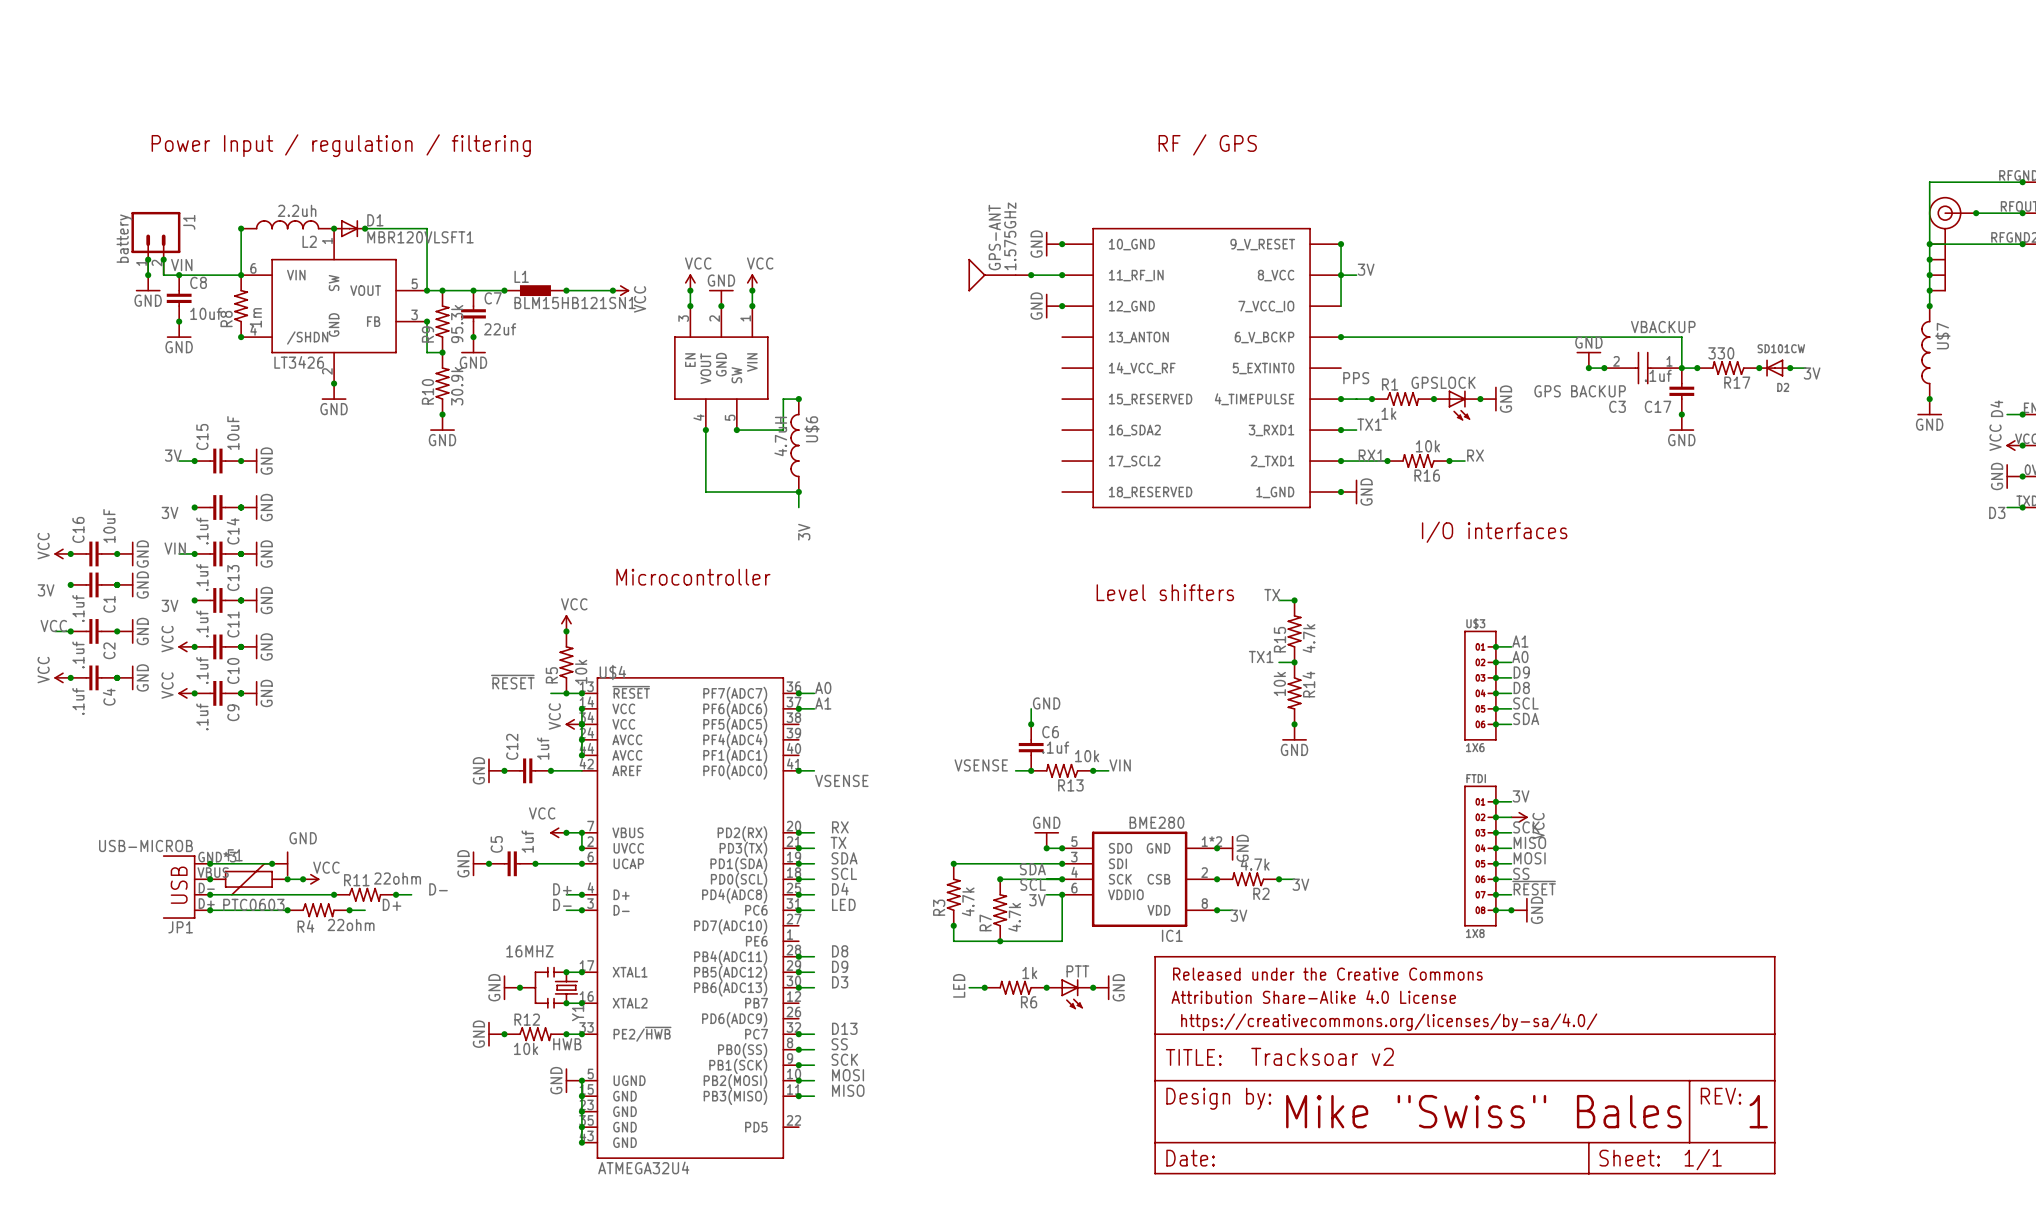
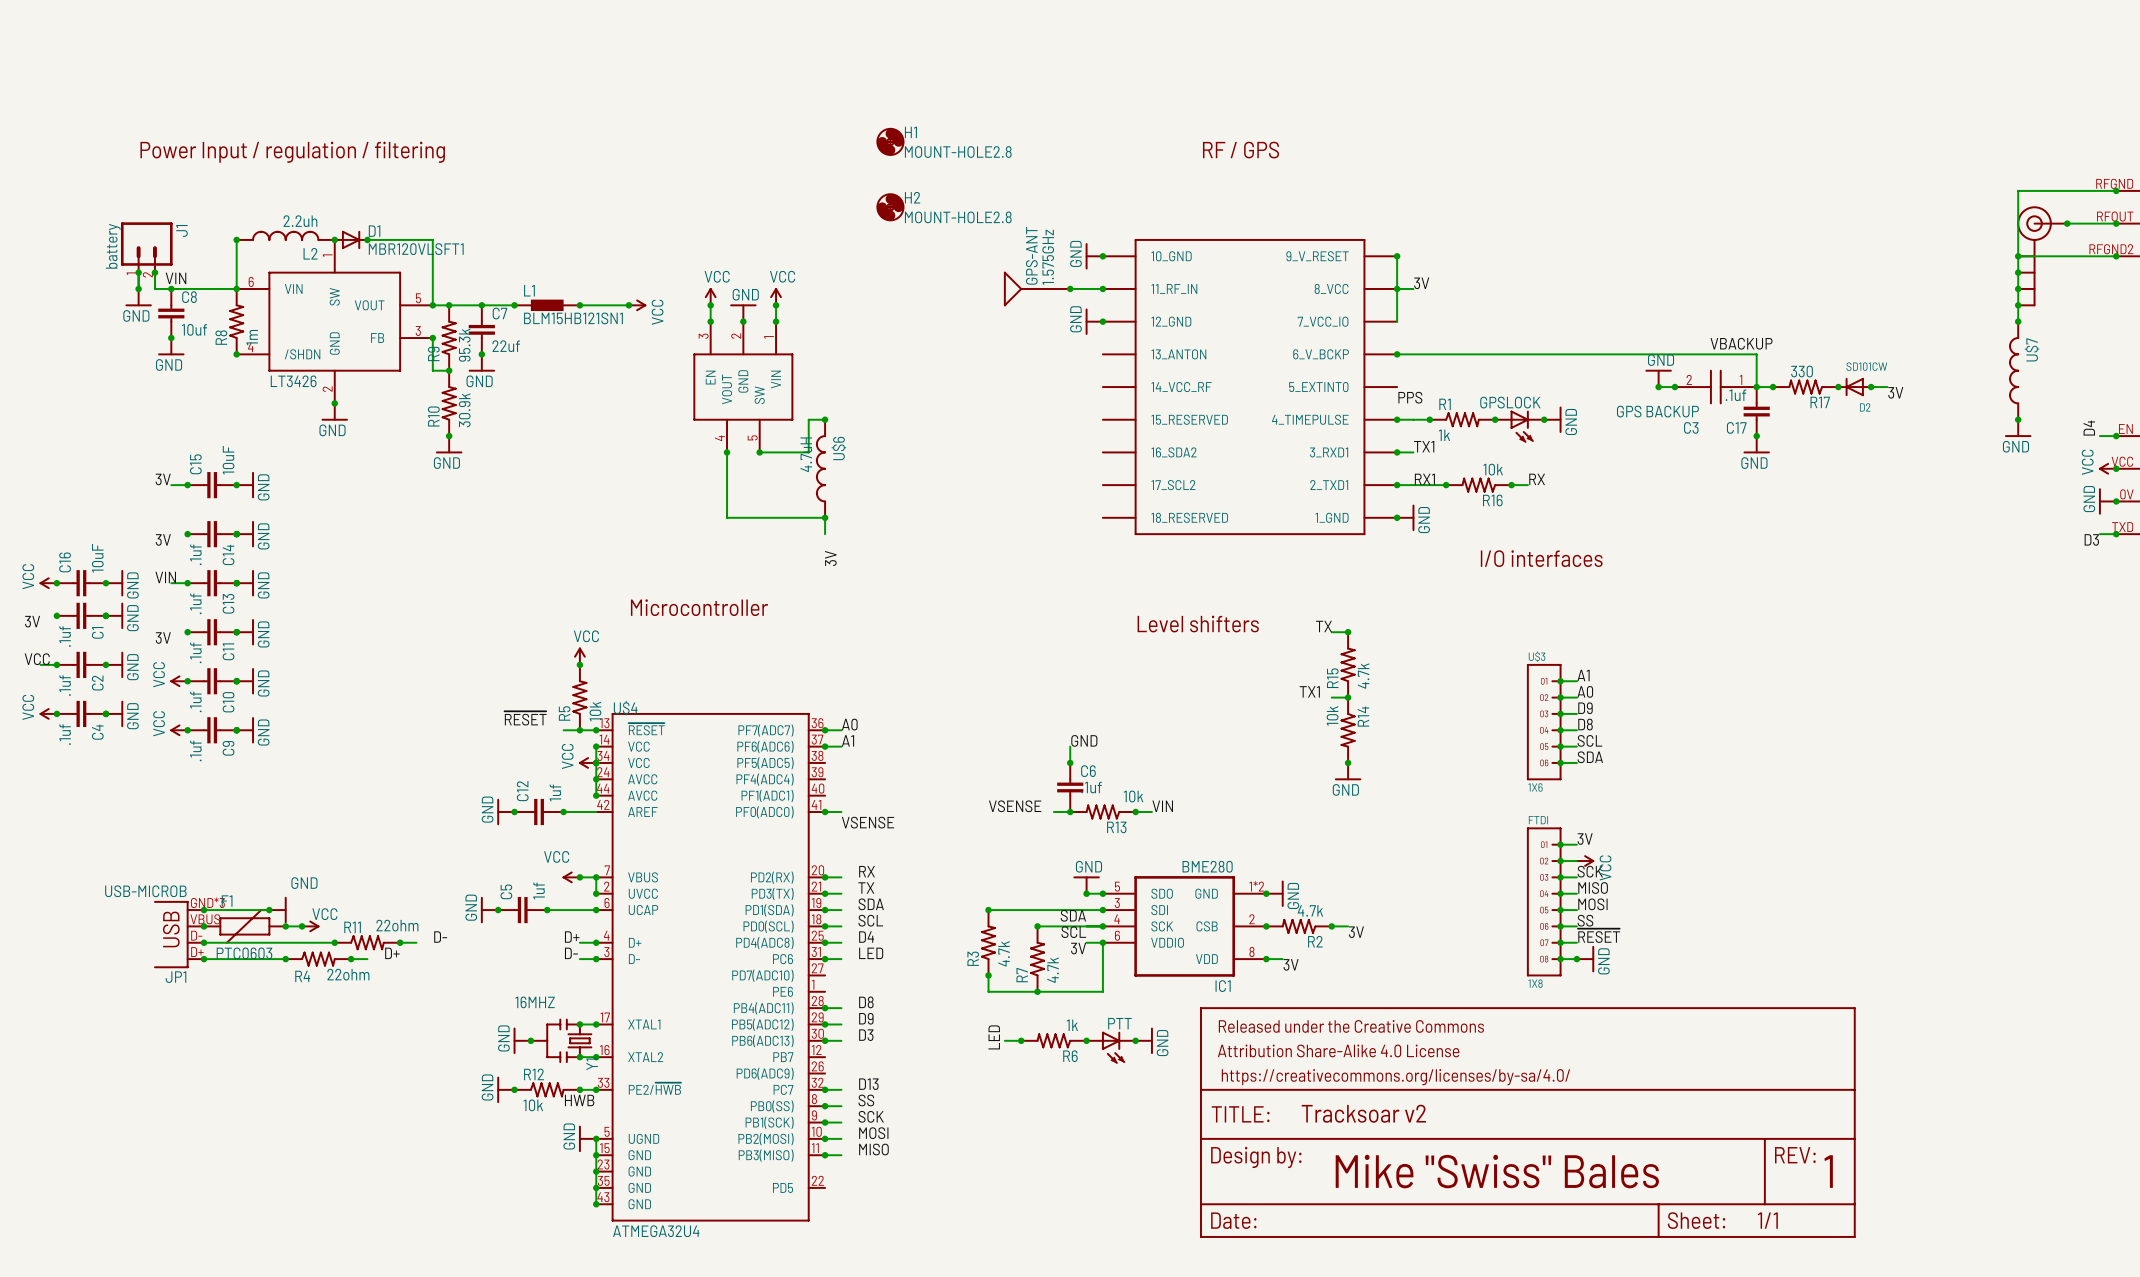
H1: none -> MOUNT-HOLE2.8 (890, 141)
H2: none -> MOUNT-HOLE2.8 (890, 207)

